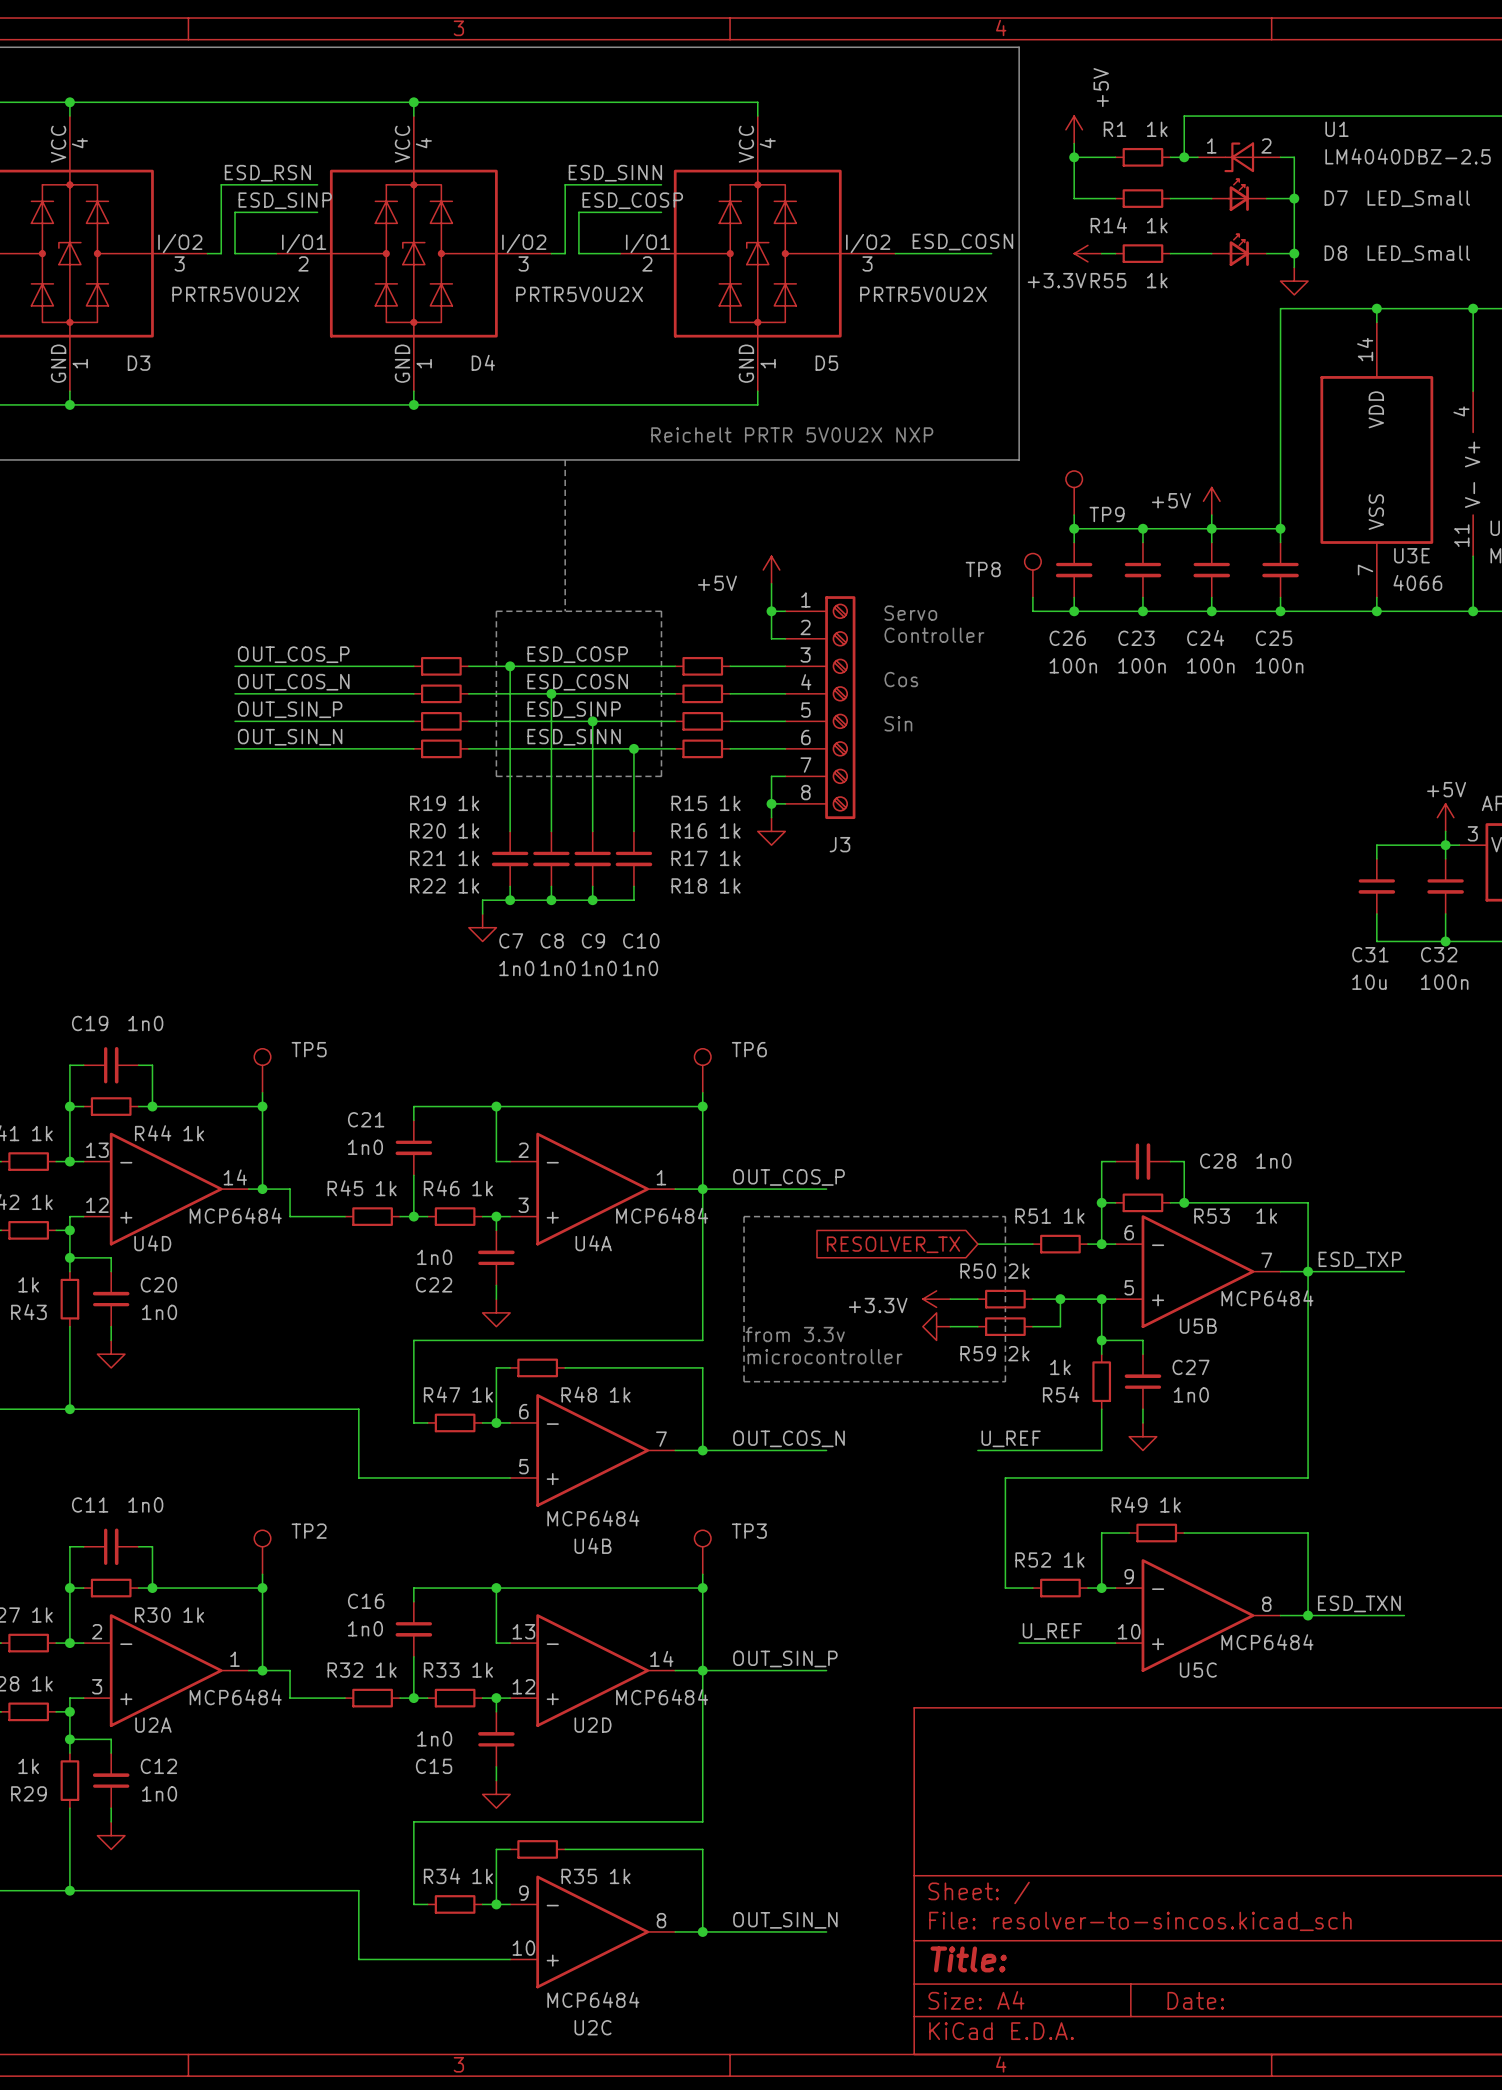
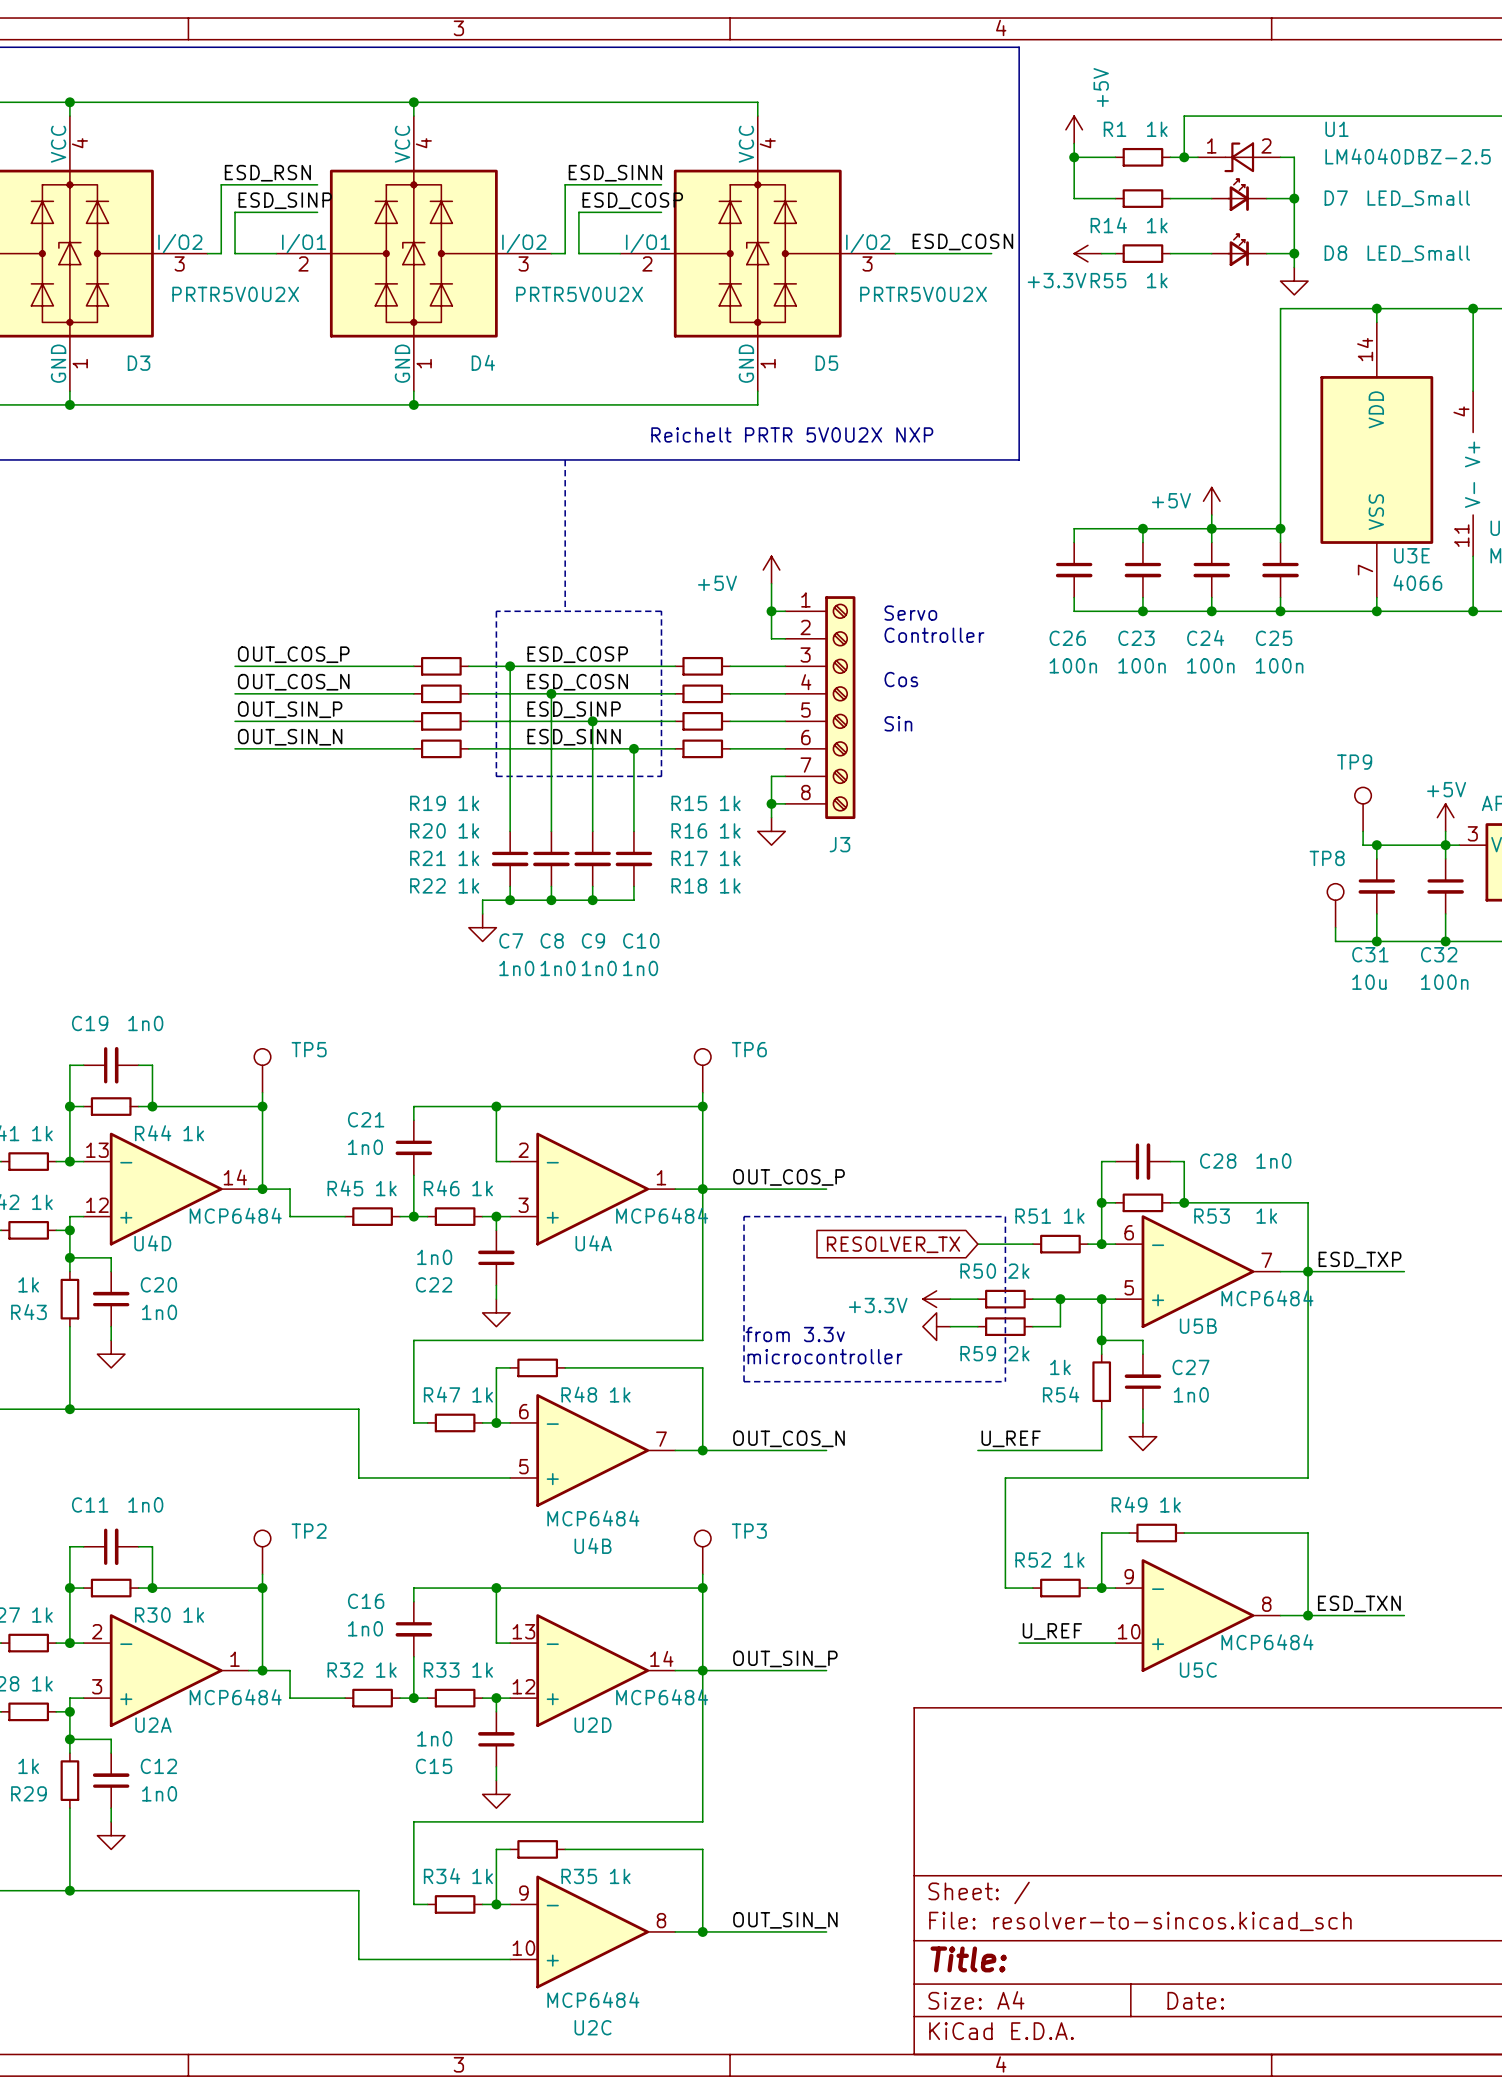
TP9 position: (1074, 492) -> (1363, 809)
TP9 name position: TP9 (1107, 514) -> TP9 (1354, 762)
wire: (1074, 515) (1074, 528) -> none
junction: (1074, 528) -> none
TP8 name position: TP8 (983, 569) -> TP8 (1327, 858)
TP8 position: (1032, 575) -> (1335, 905)
wire: (1032, 597) (1032, 611) (1074, 611) -> none
junction: (1074, 611) -> none
wire: none -> (1363, 831) (1363, 845) (1376, 845)
junction: none -> (1376, 845)
wire: none -> (1335, 927) (1335, 941) (1376, 941)
junction: none -> (1376, 941)

